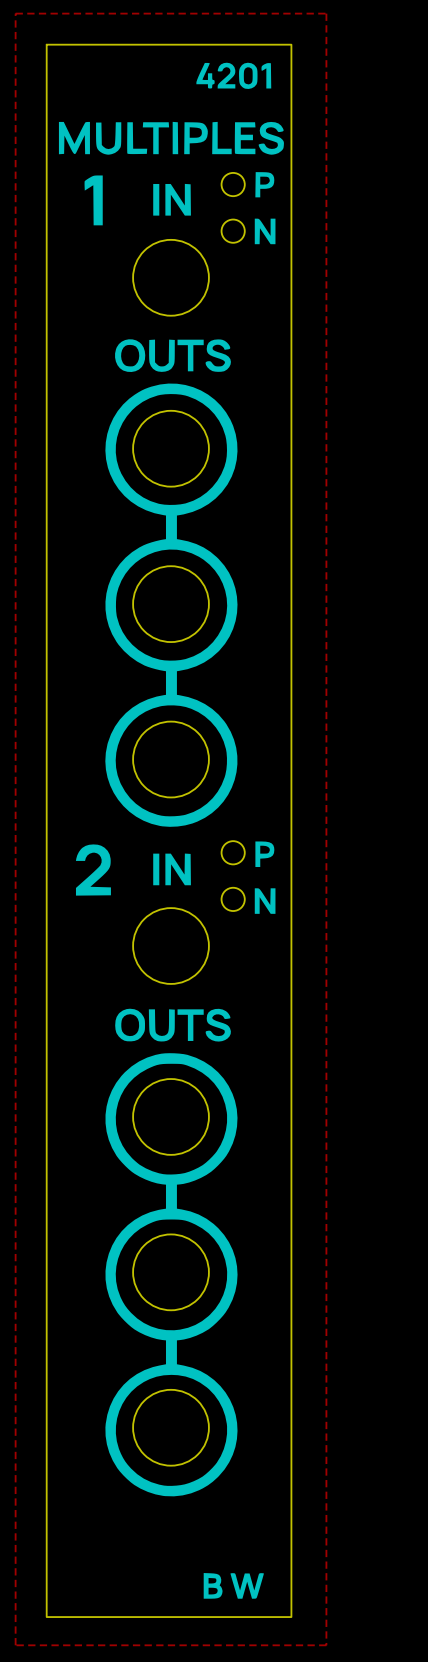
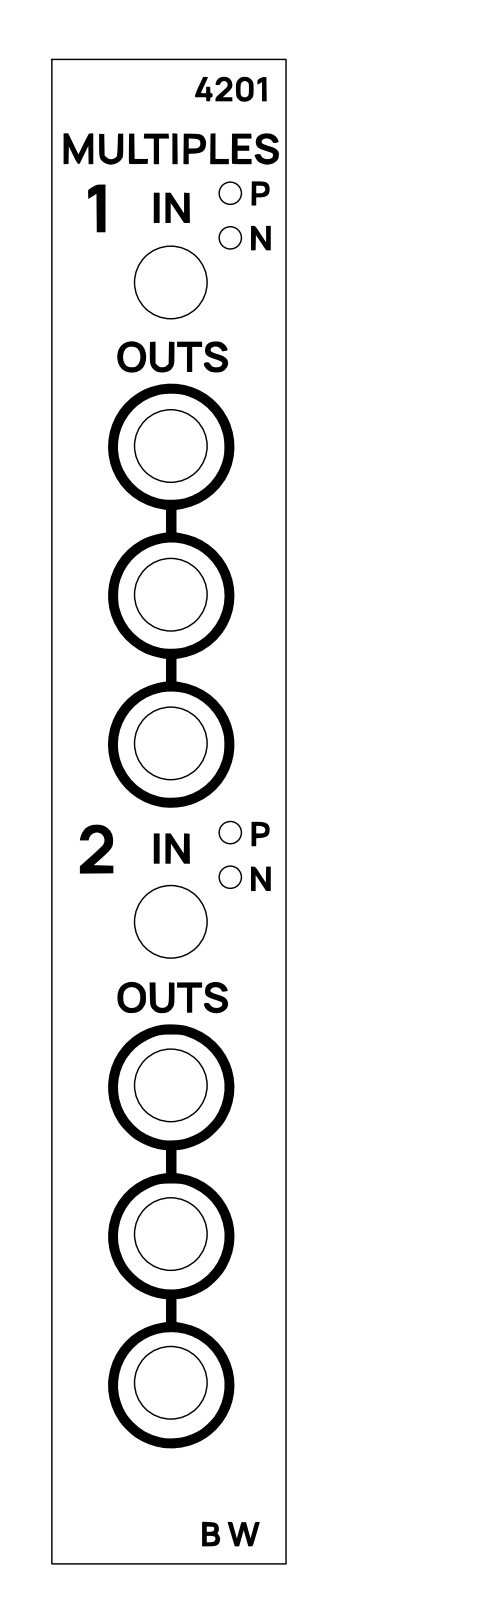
zone outline: (15, 13) (15, 1645) (326, 1645) (326, 13) (15, 13) -> none

